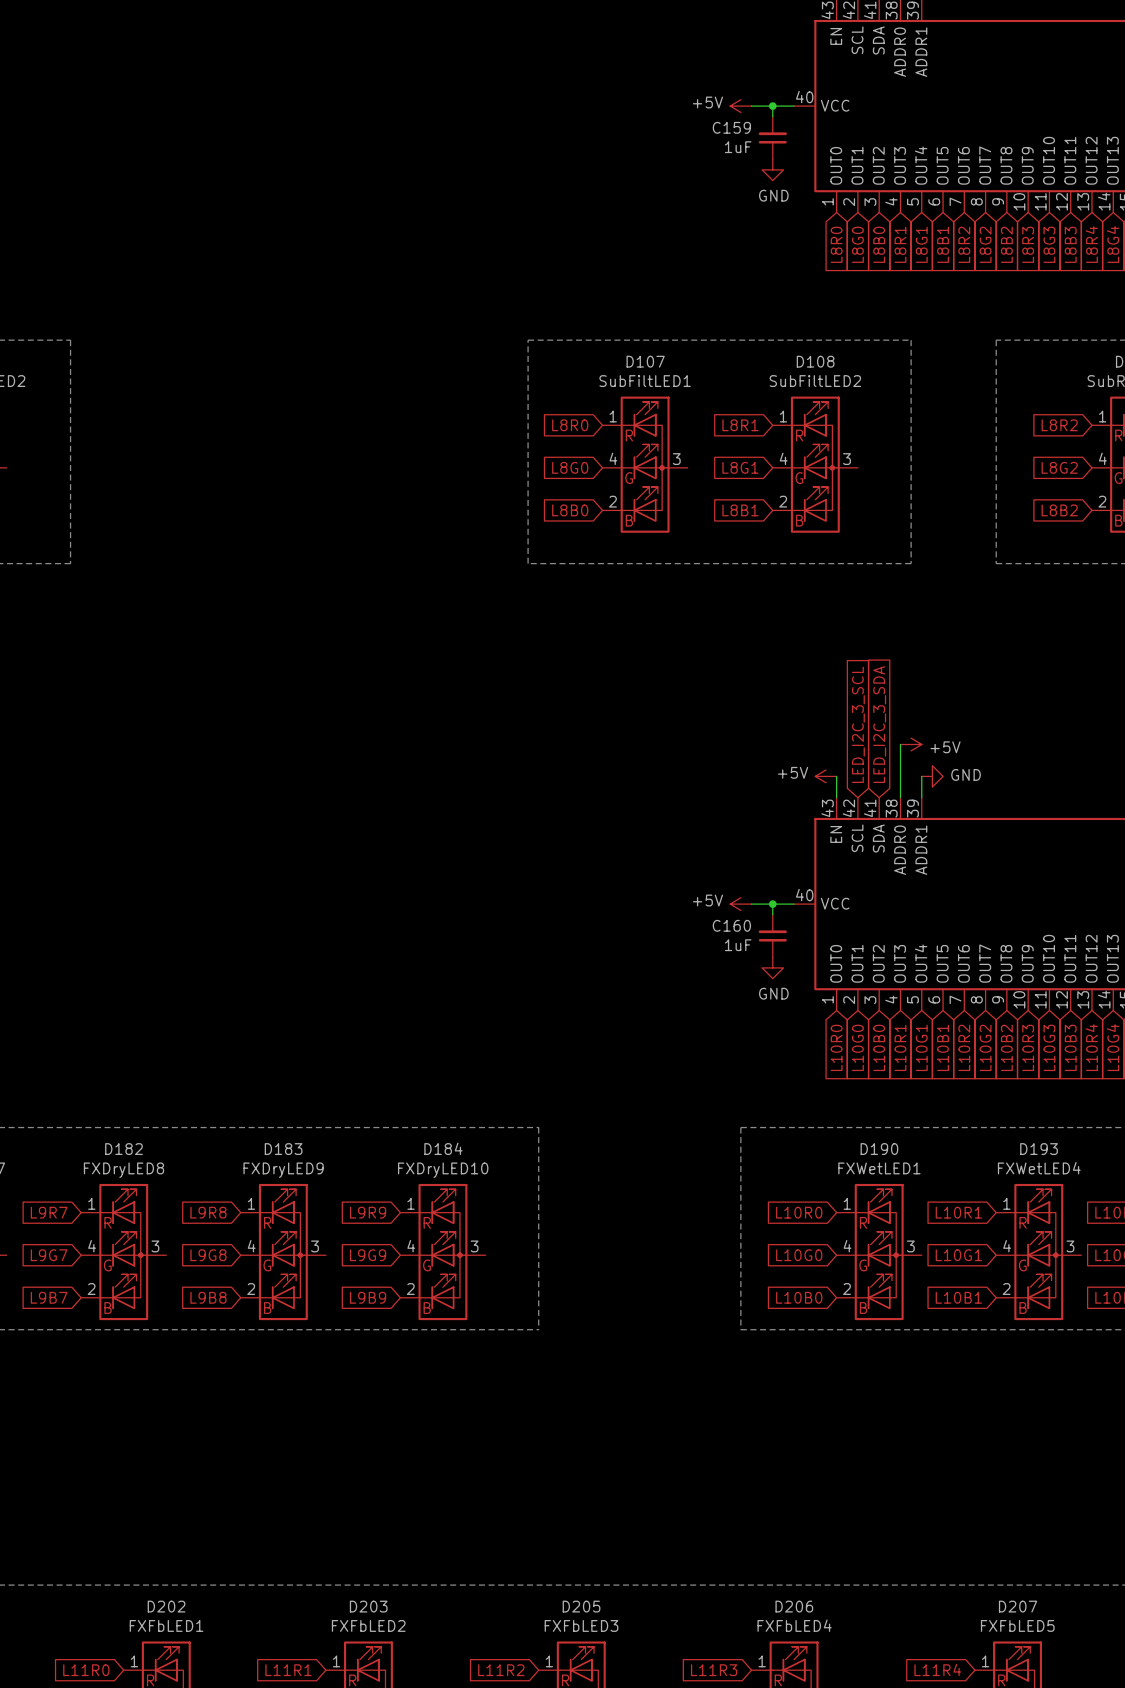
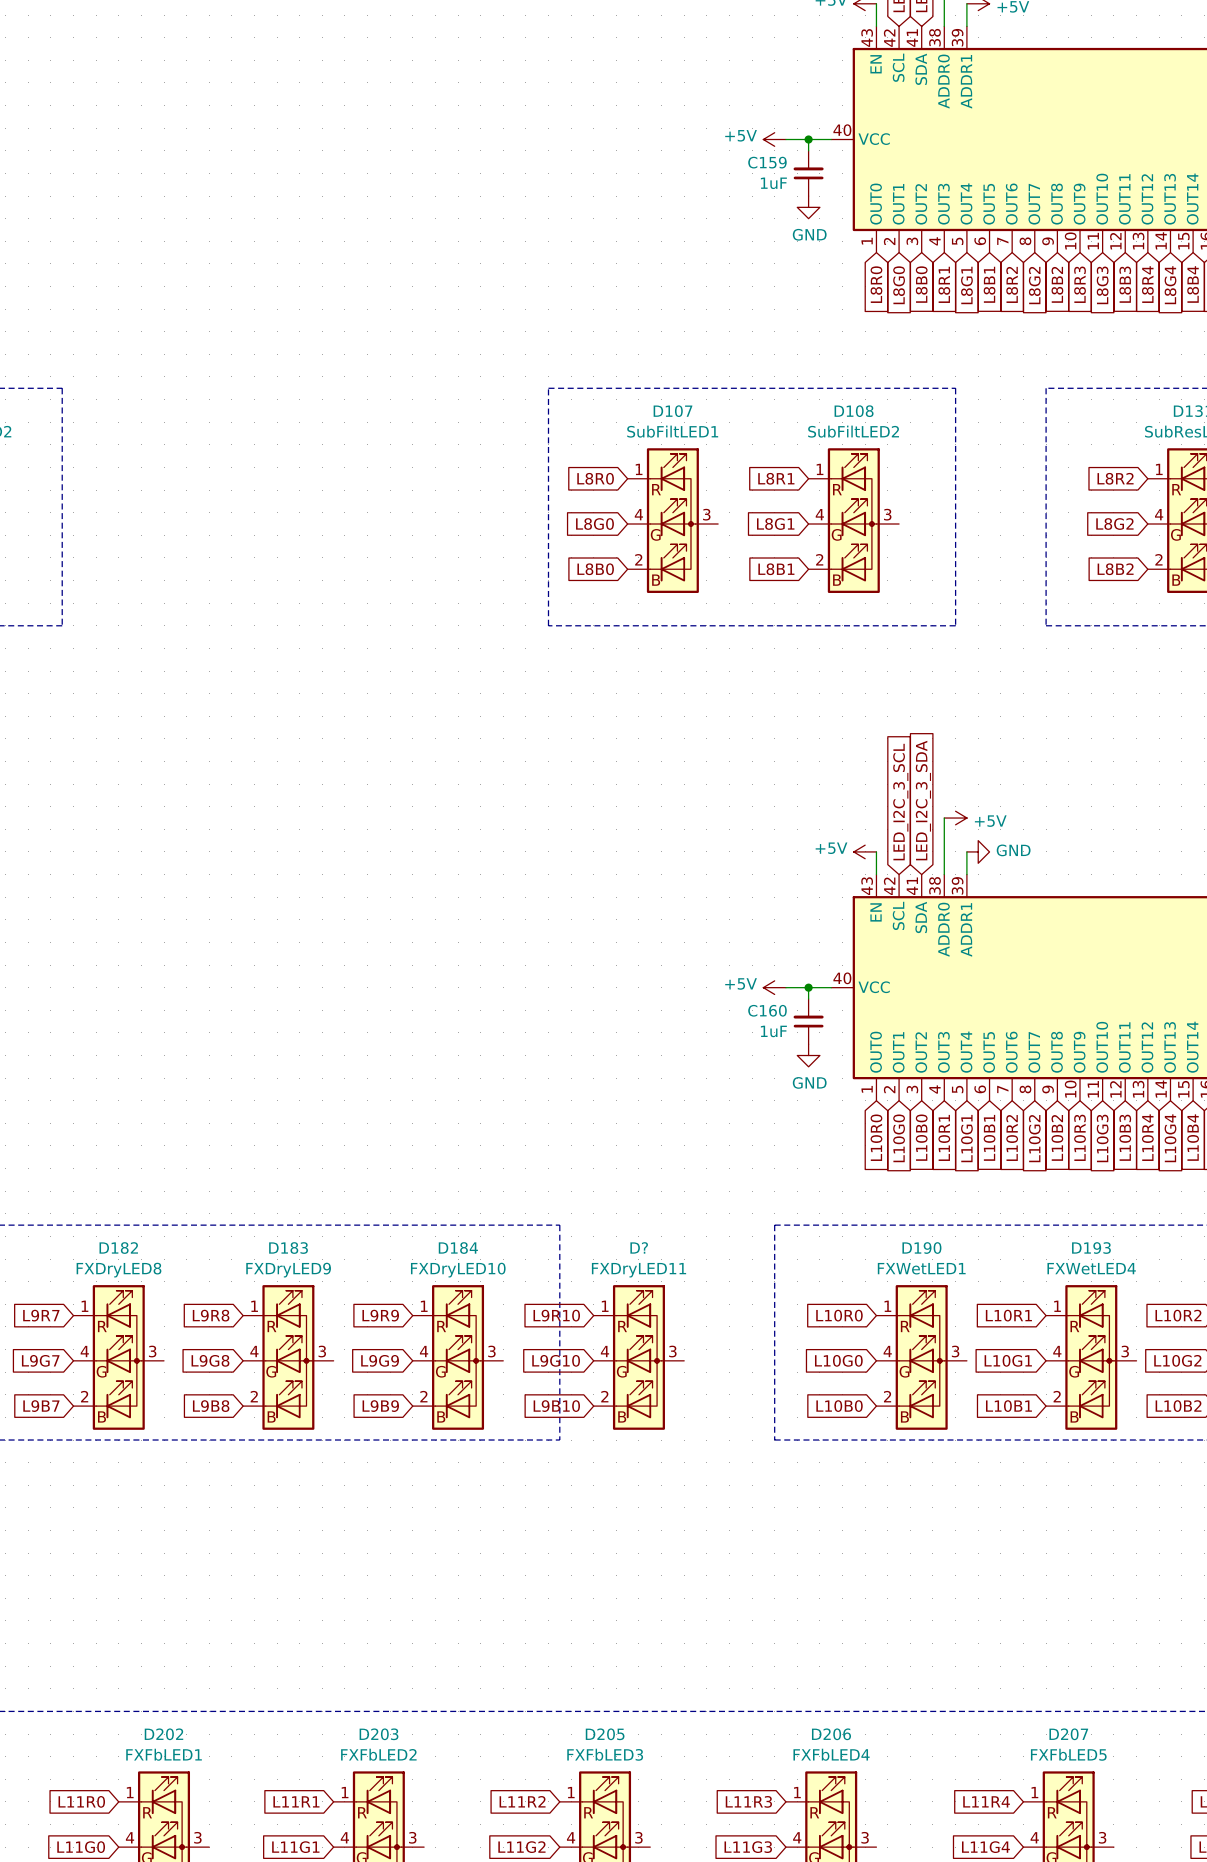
global label: none -> L9R10 (556, 1315)
D?: none -> FXDryLED11 (638, 1357)
global label: none -> L9G10 (556, 1360)
global label: none -> L9B10 (556, 1406)

